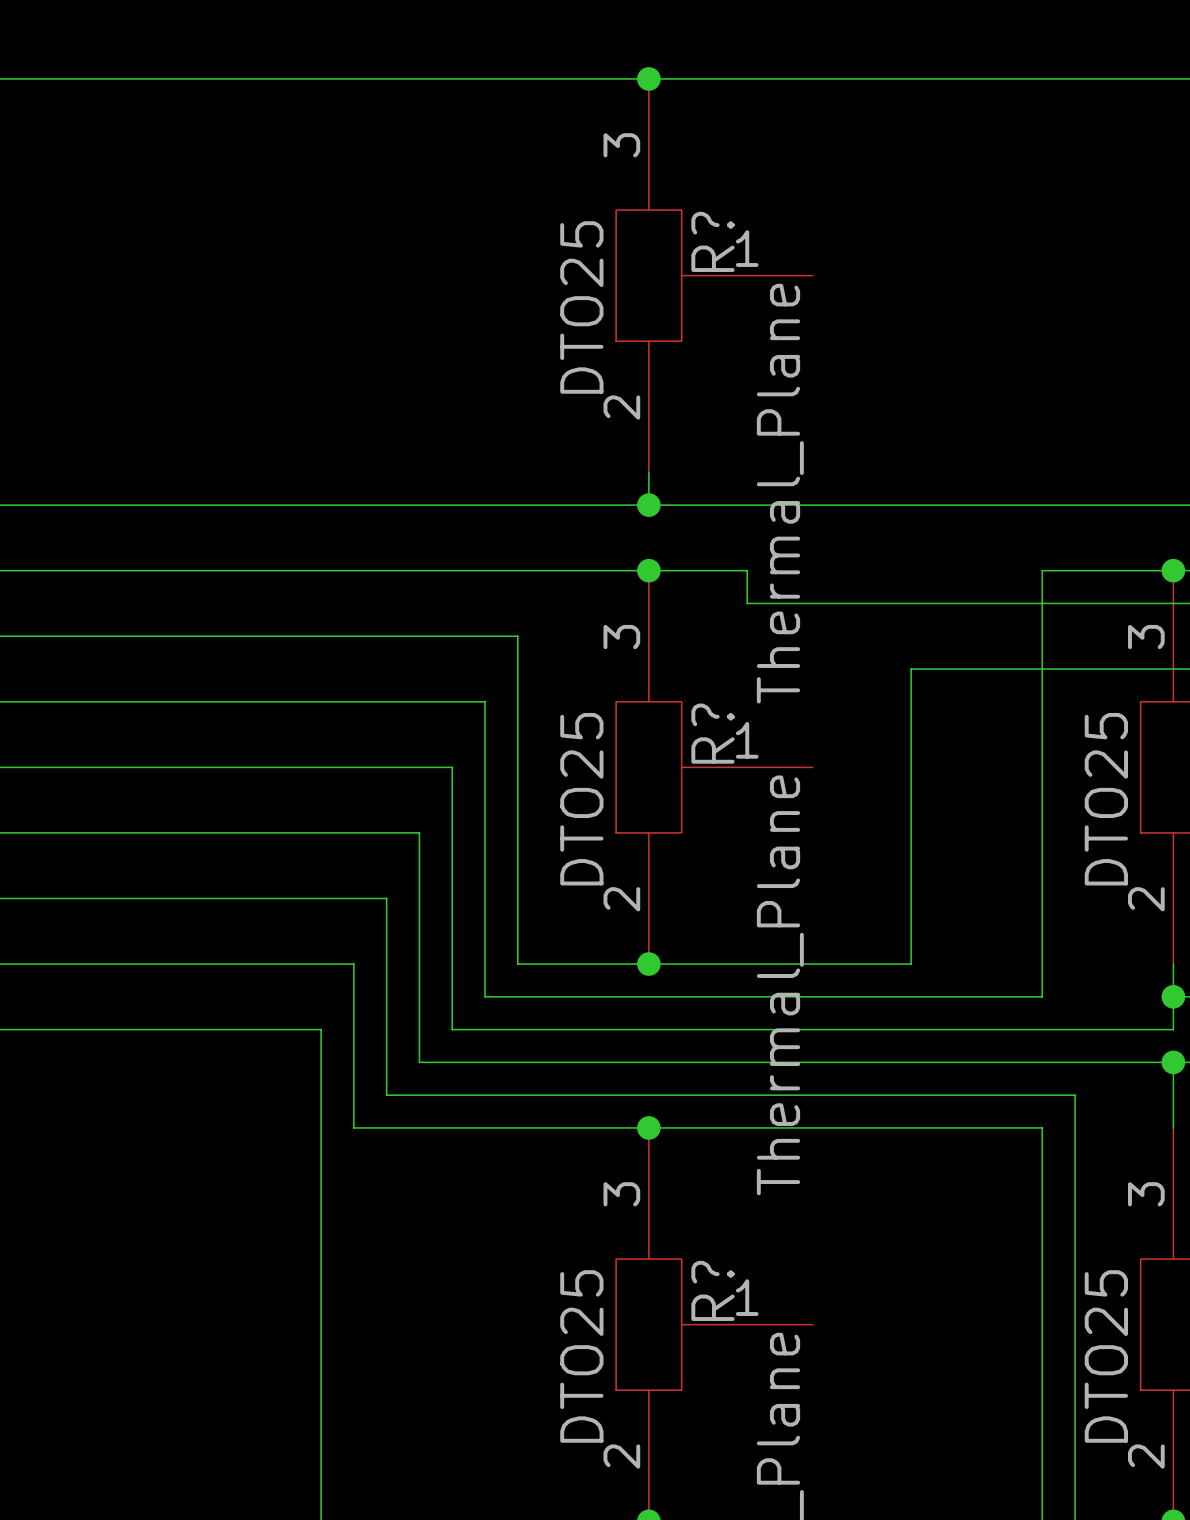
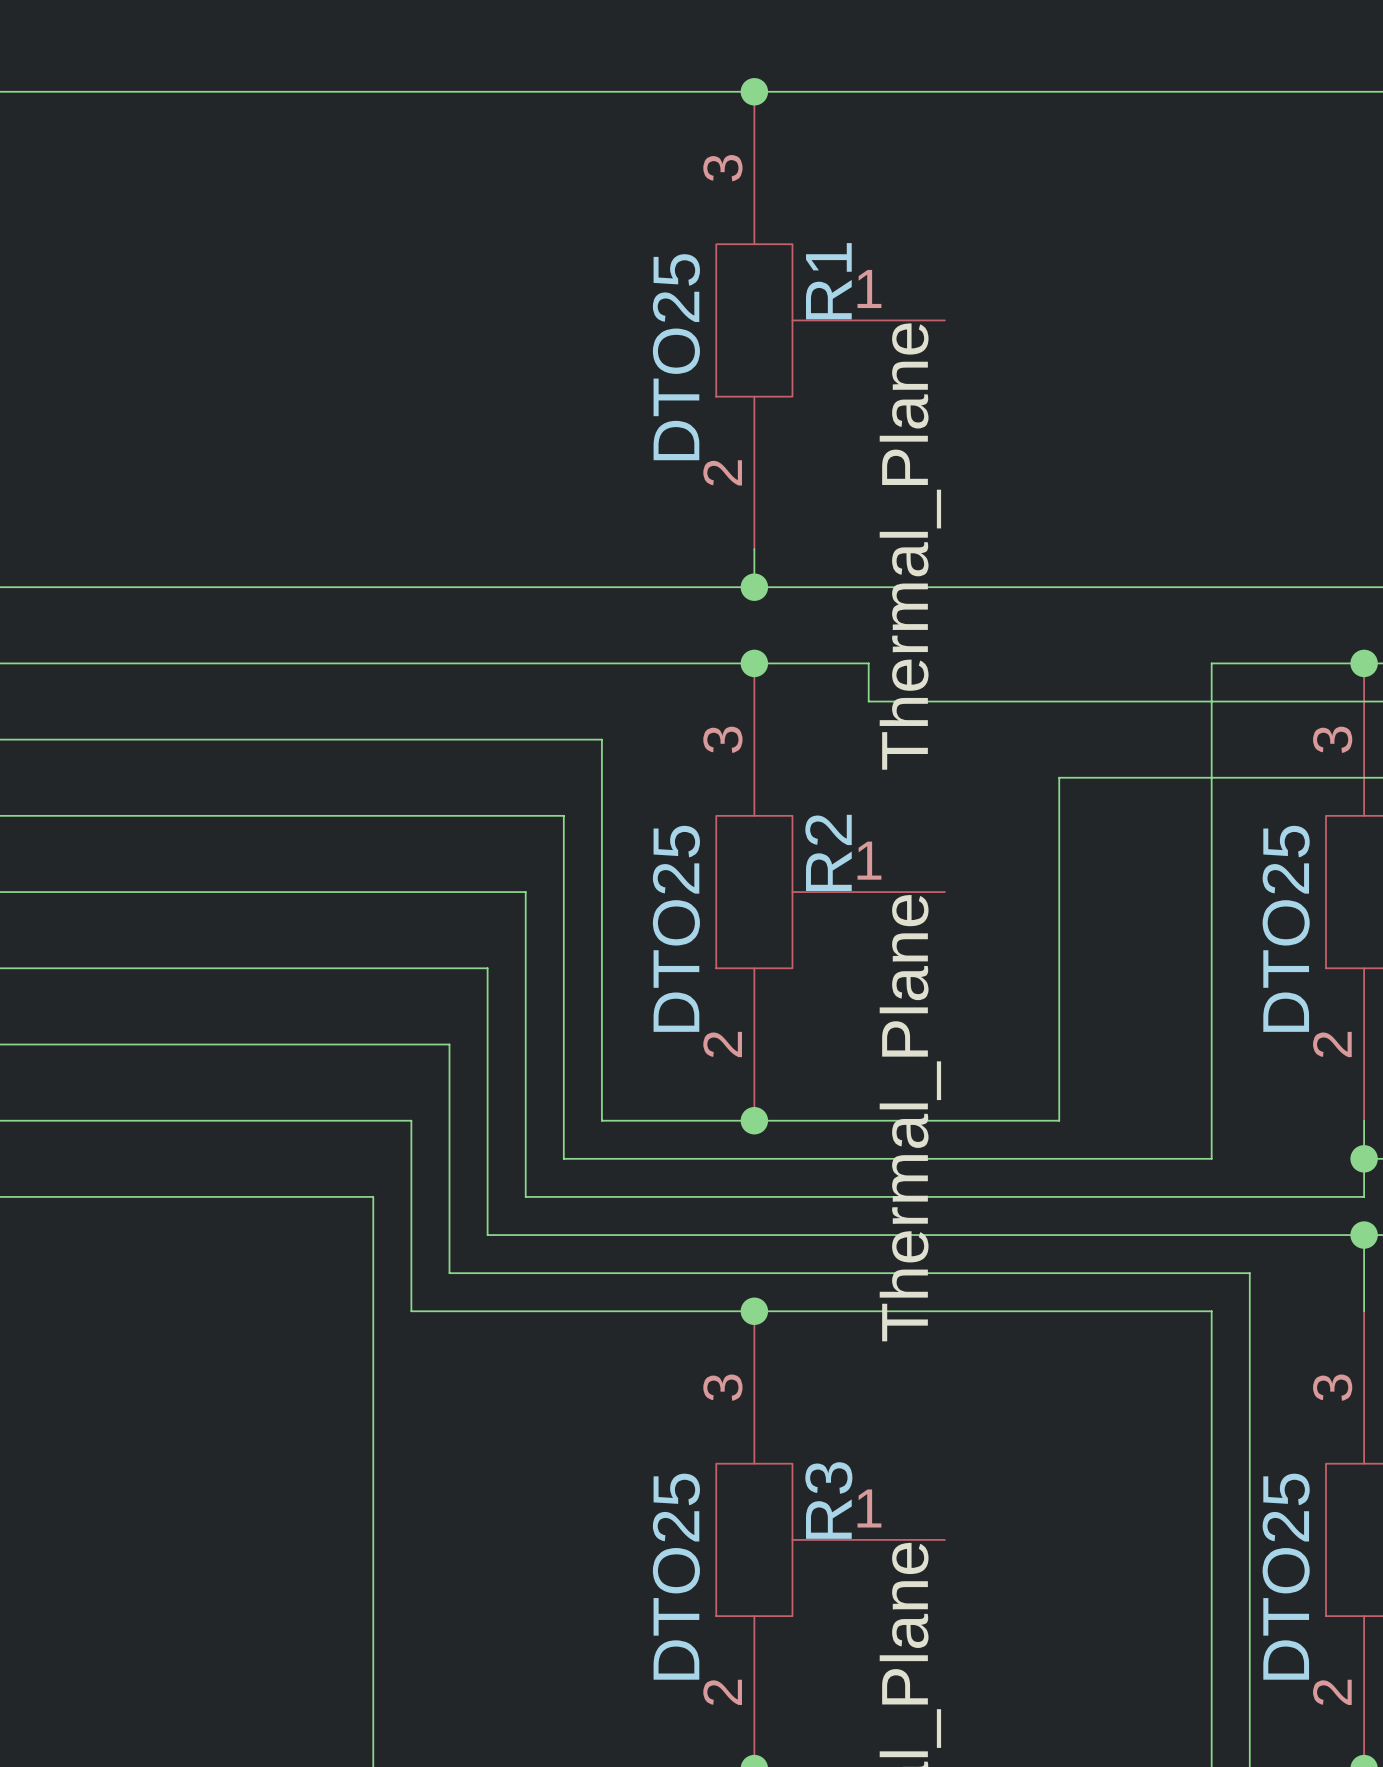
R? name: R? (712, 241) -> R1 (828, 281)
R? name: R? (712, 733) -> R2 (828, 852)
R? name: R? (712, 1290) -> R3 (828, 1500)

